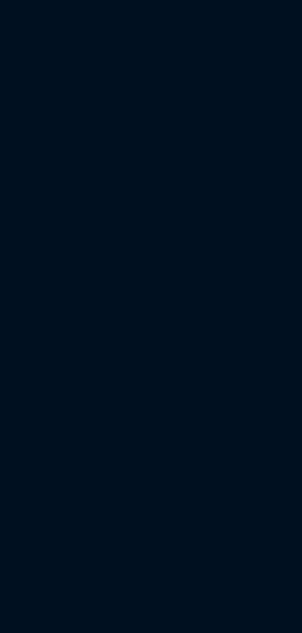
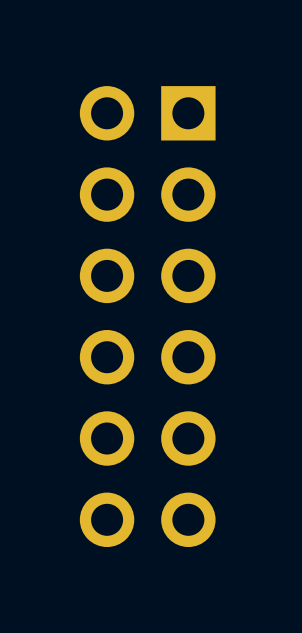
part: none -> (147, 316)

